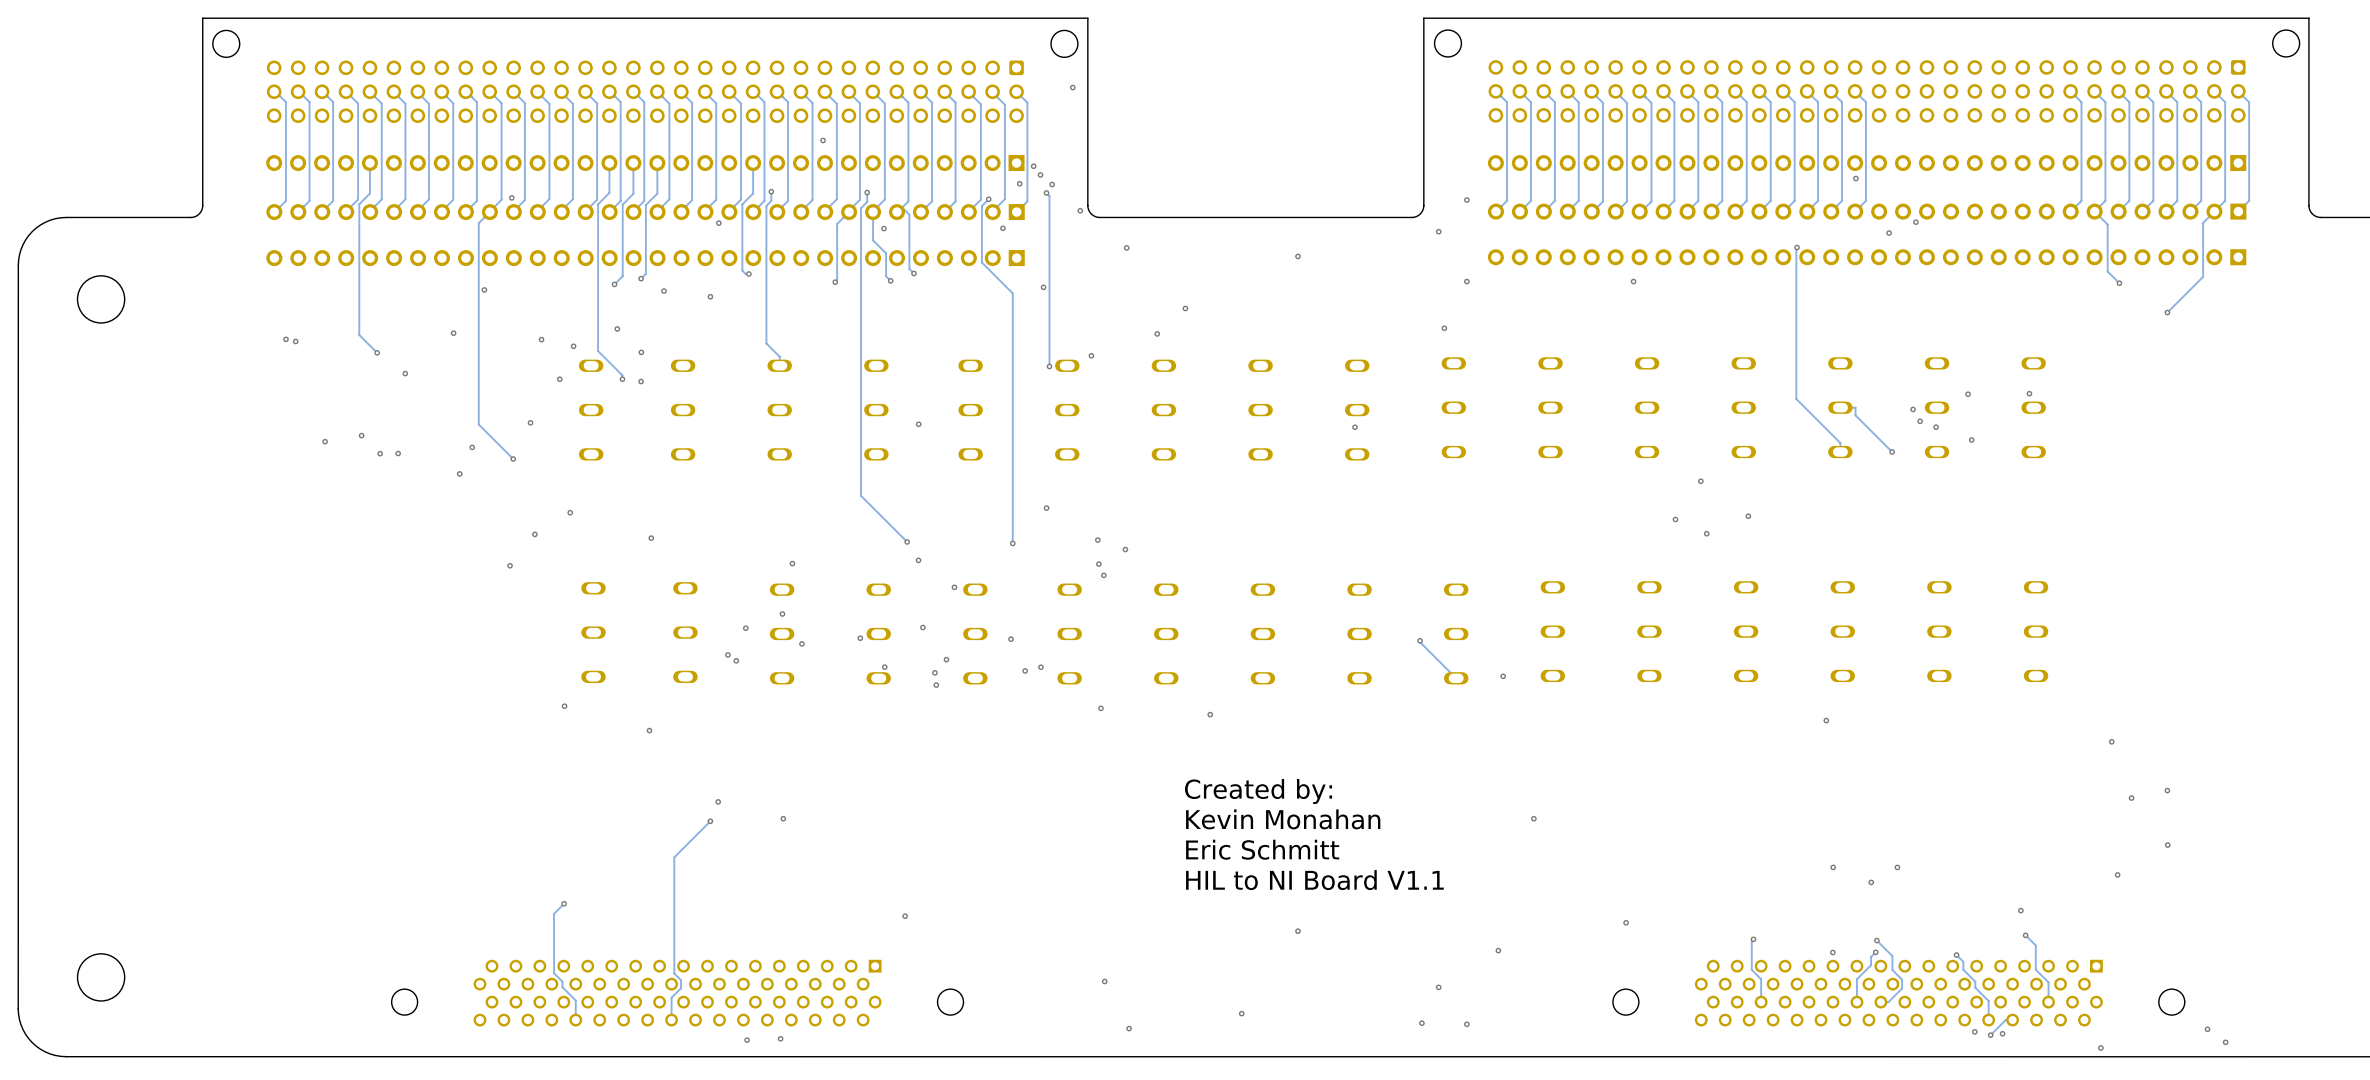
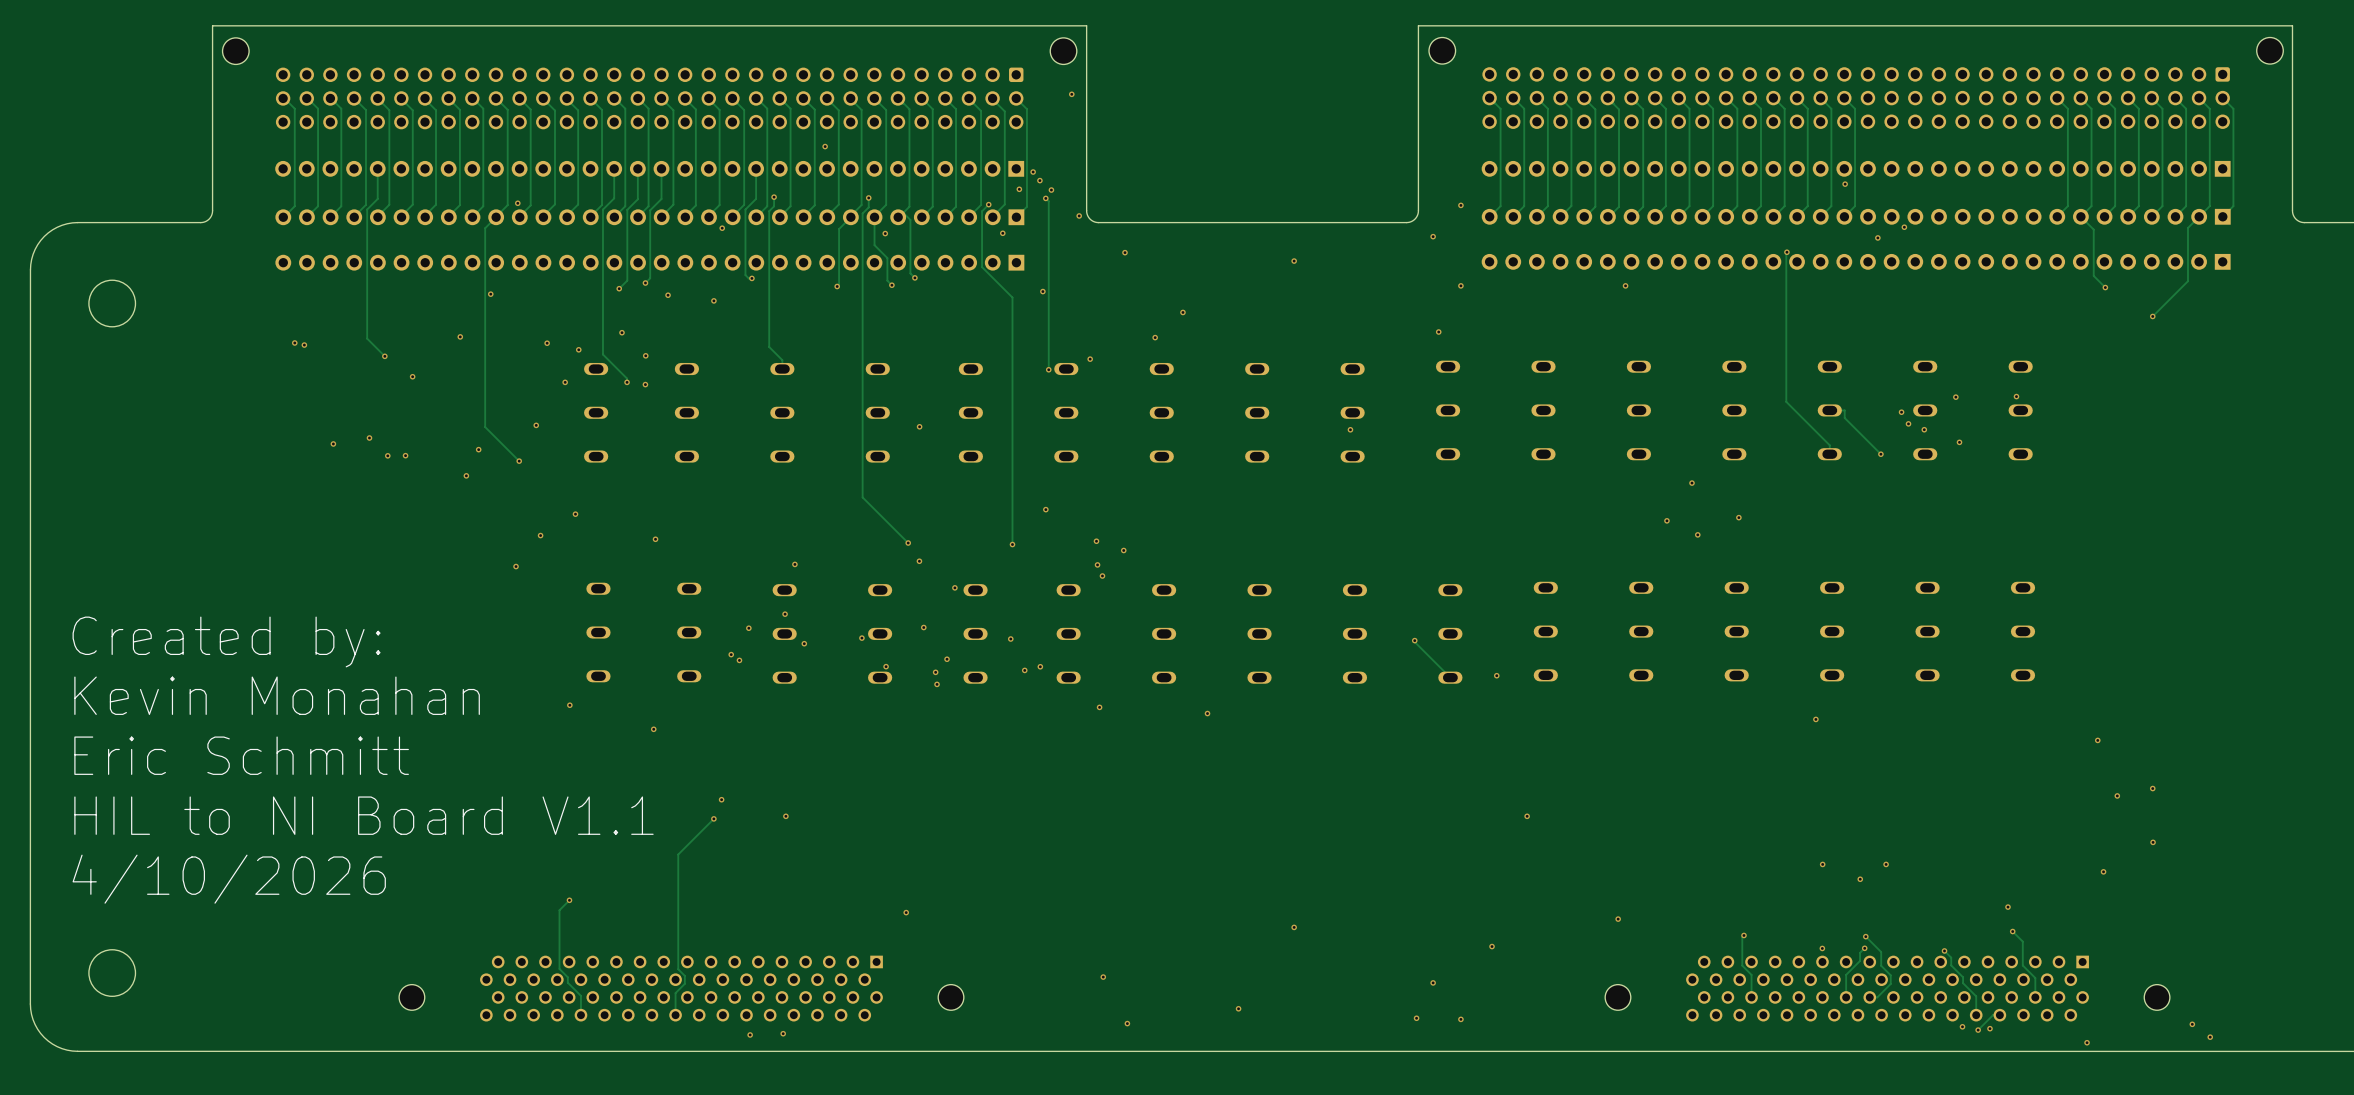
text: none -> Created by: (226, 641)
text: none -> Kevin Monahan (277, 695)
text: none -> Eric Schmitt (241, 755)
text: Created by: (1258, 791) -> none
text: none -> HIL to NI Board V1.1 (363, 815)
text: Kevin Monahan (1283, 819) -> none
text: Eric Schmitt (1262, 849) -> none
text: none -> 4/10/2026 (229, 879)
text: HIL to NI Board V1.1 (1314, 880) -> none

